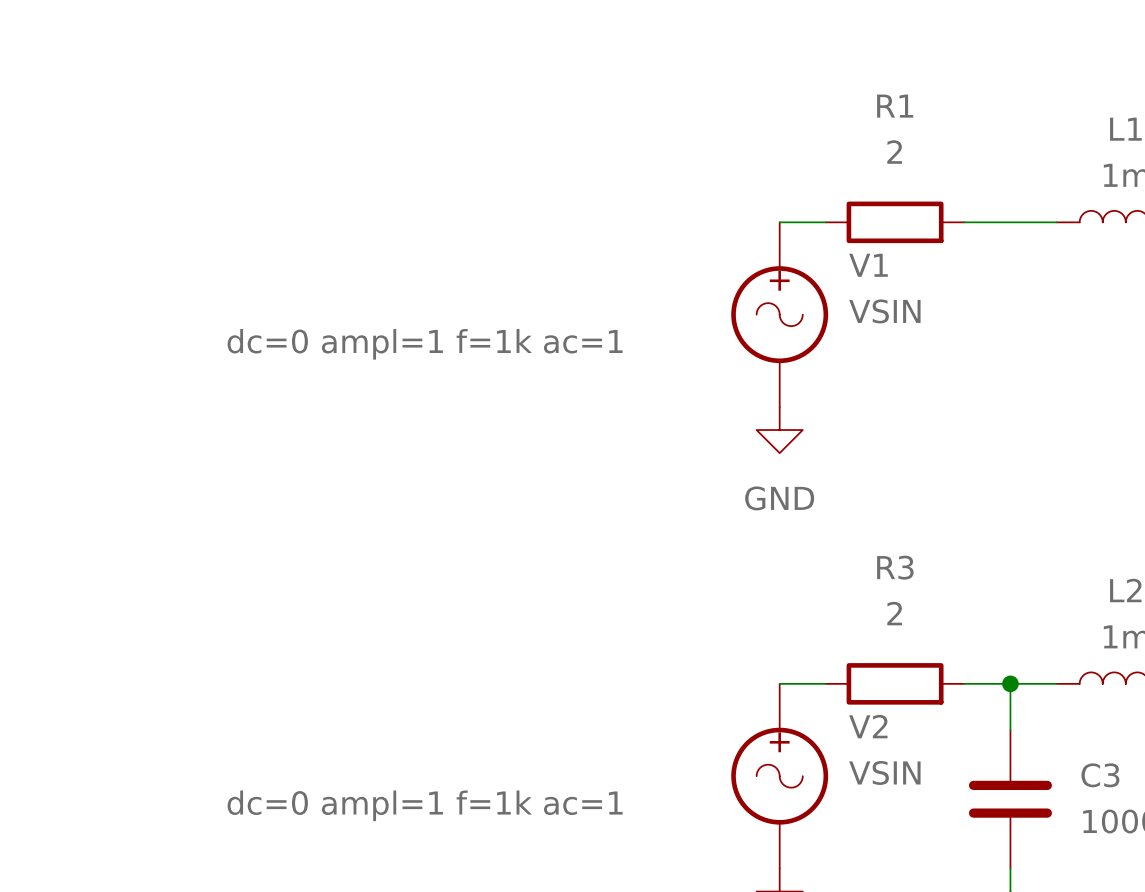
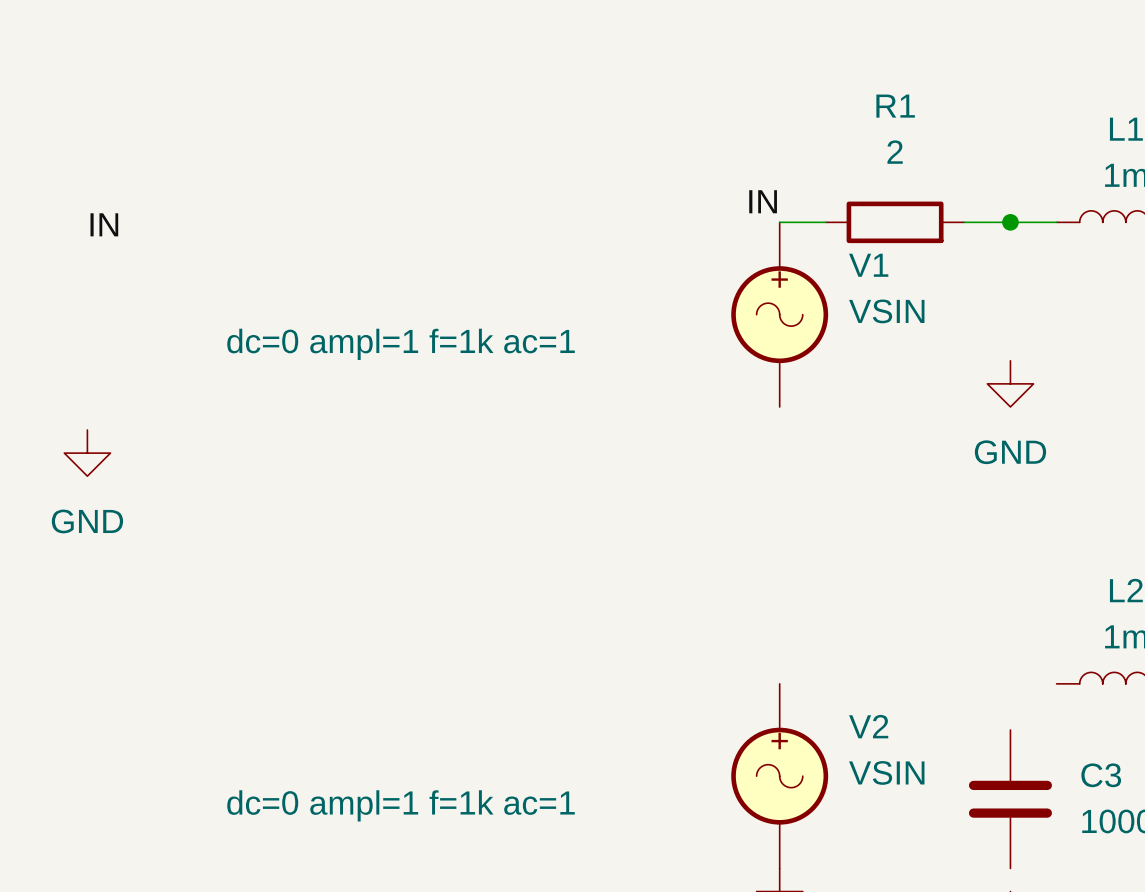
label: none -> IN (763, 201)
junction: none -> (1010, 222)
label: none -> IN (104, 224)
power symbol: none -> GND (1010, 383)
power symbol: GND (779, 430) -> none
power symbol: none -> GND (87, 453)
wire: (779, 683) (825, 683) -> none
R3: 2 (895, 683) -> none
wire: (964, 683) (1056, 683) -> none
wire: (1010, 683) (1010, 730) -> none
junction: (1010, 683) -> none
wire: (1010, 868) (1010, 891) -> none

